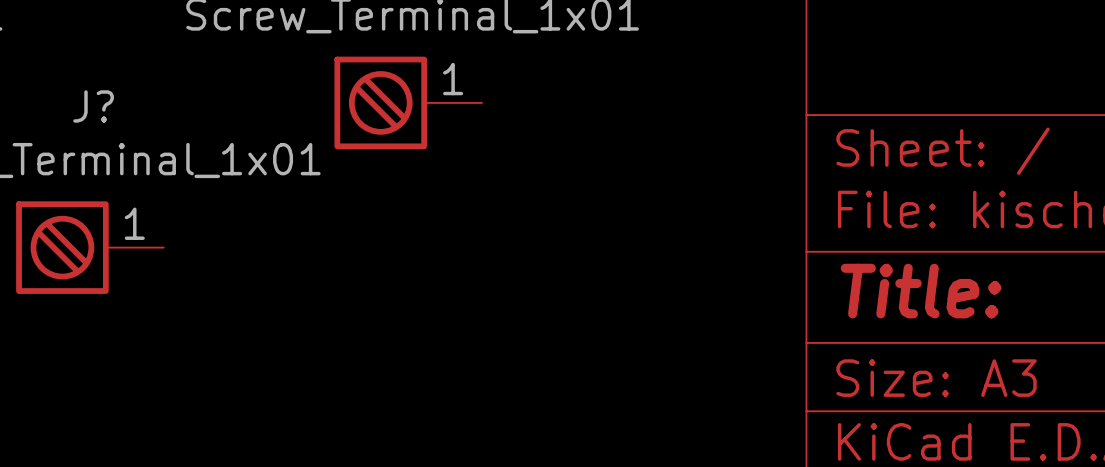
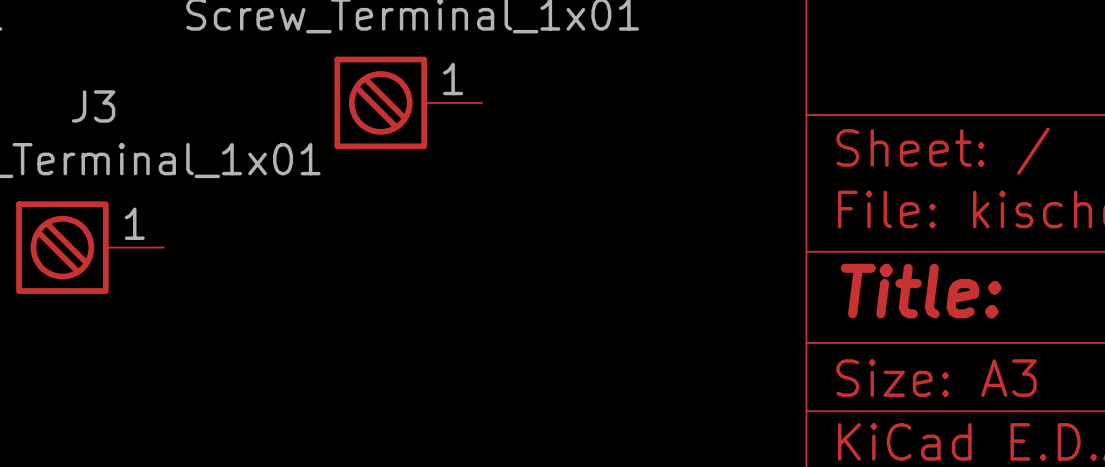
J? name: J? (93, 106) -> J3 (93, 106)

